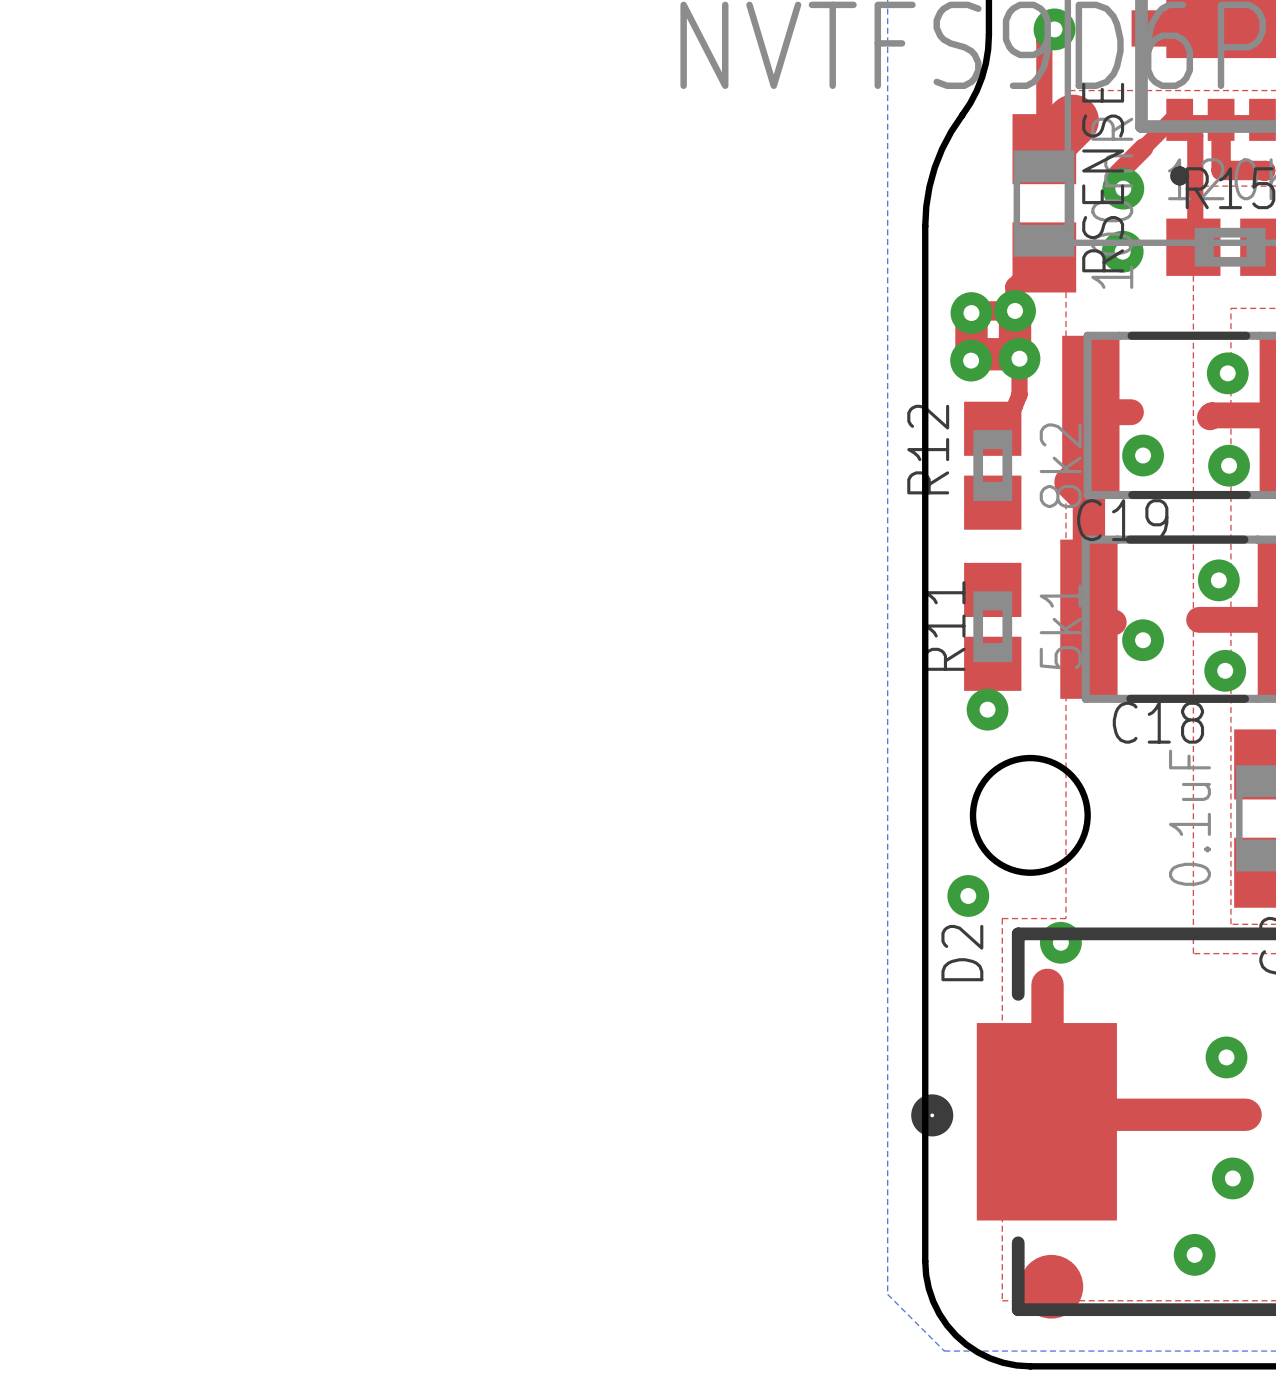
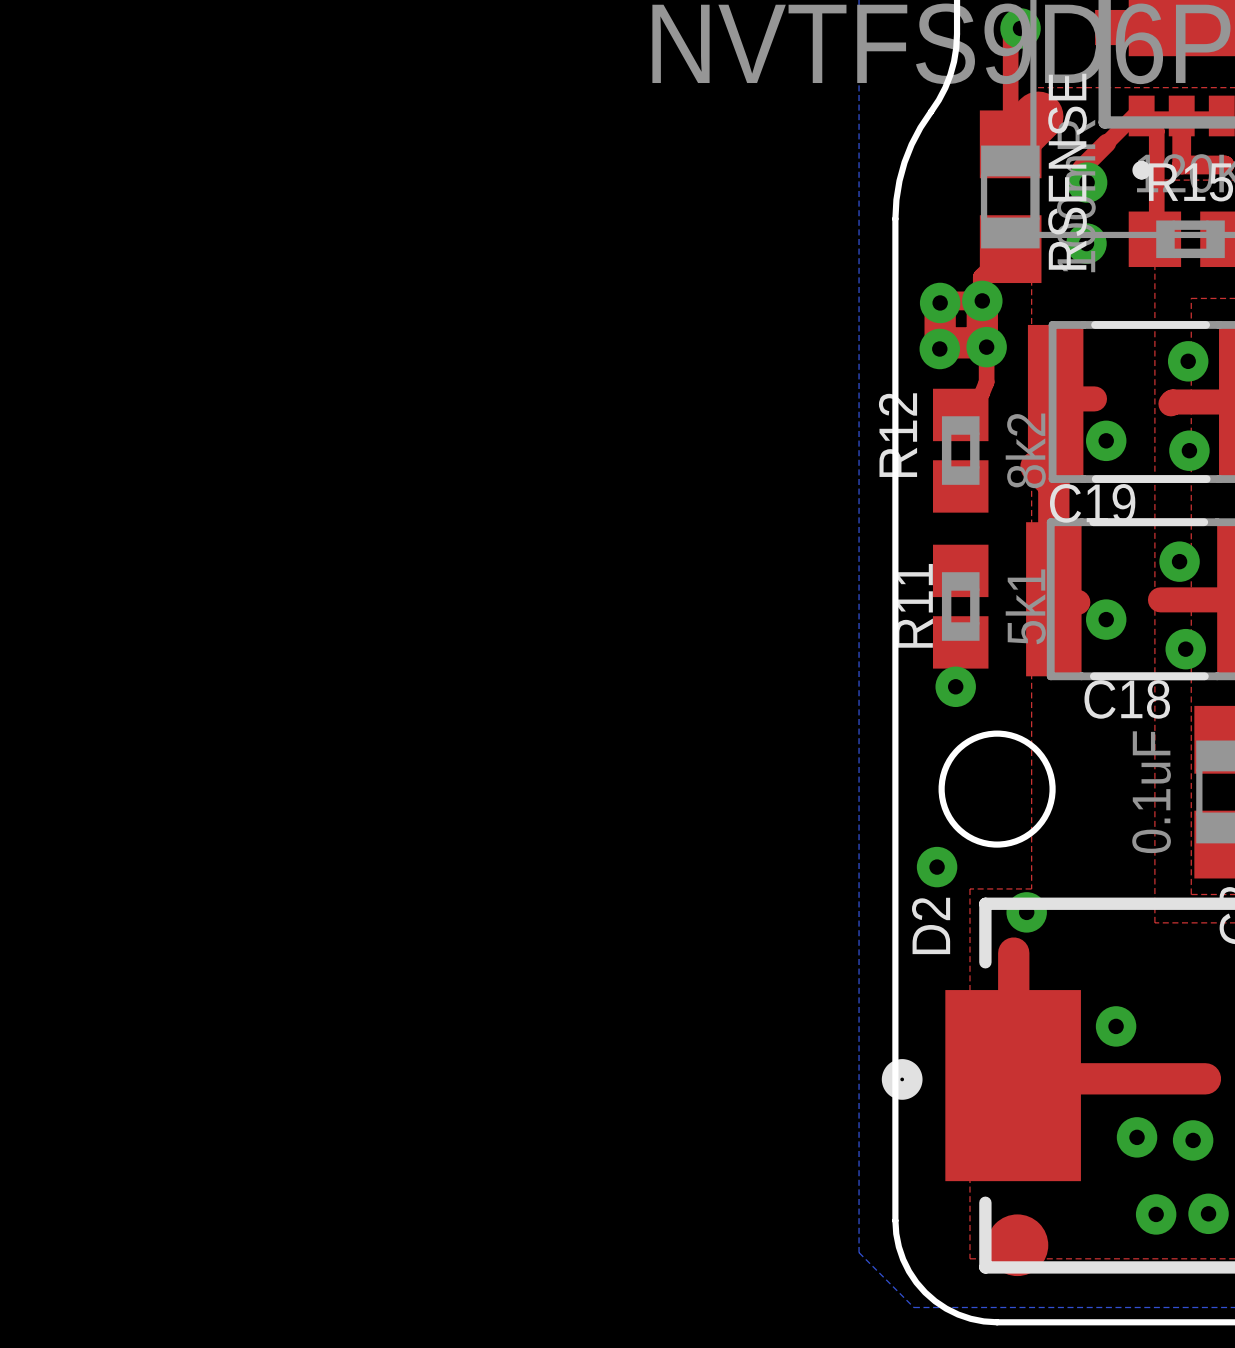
via: (1226, 1057) -> none
via: none -> (1116, 1026)
via: none -> (1137, 1137)
via: none -> (1208, 1213)

